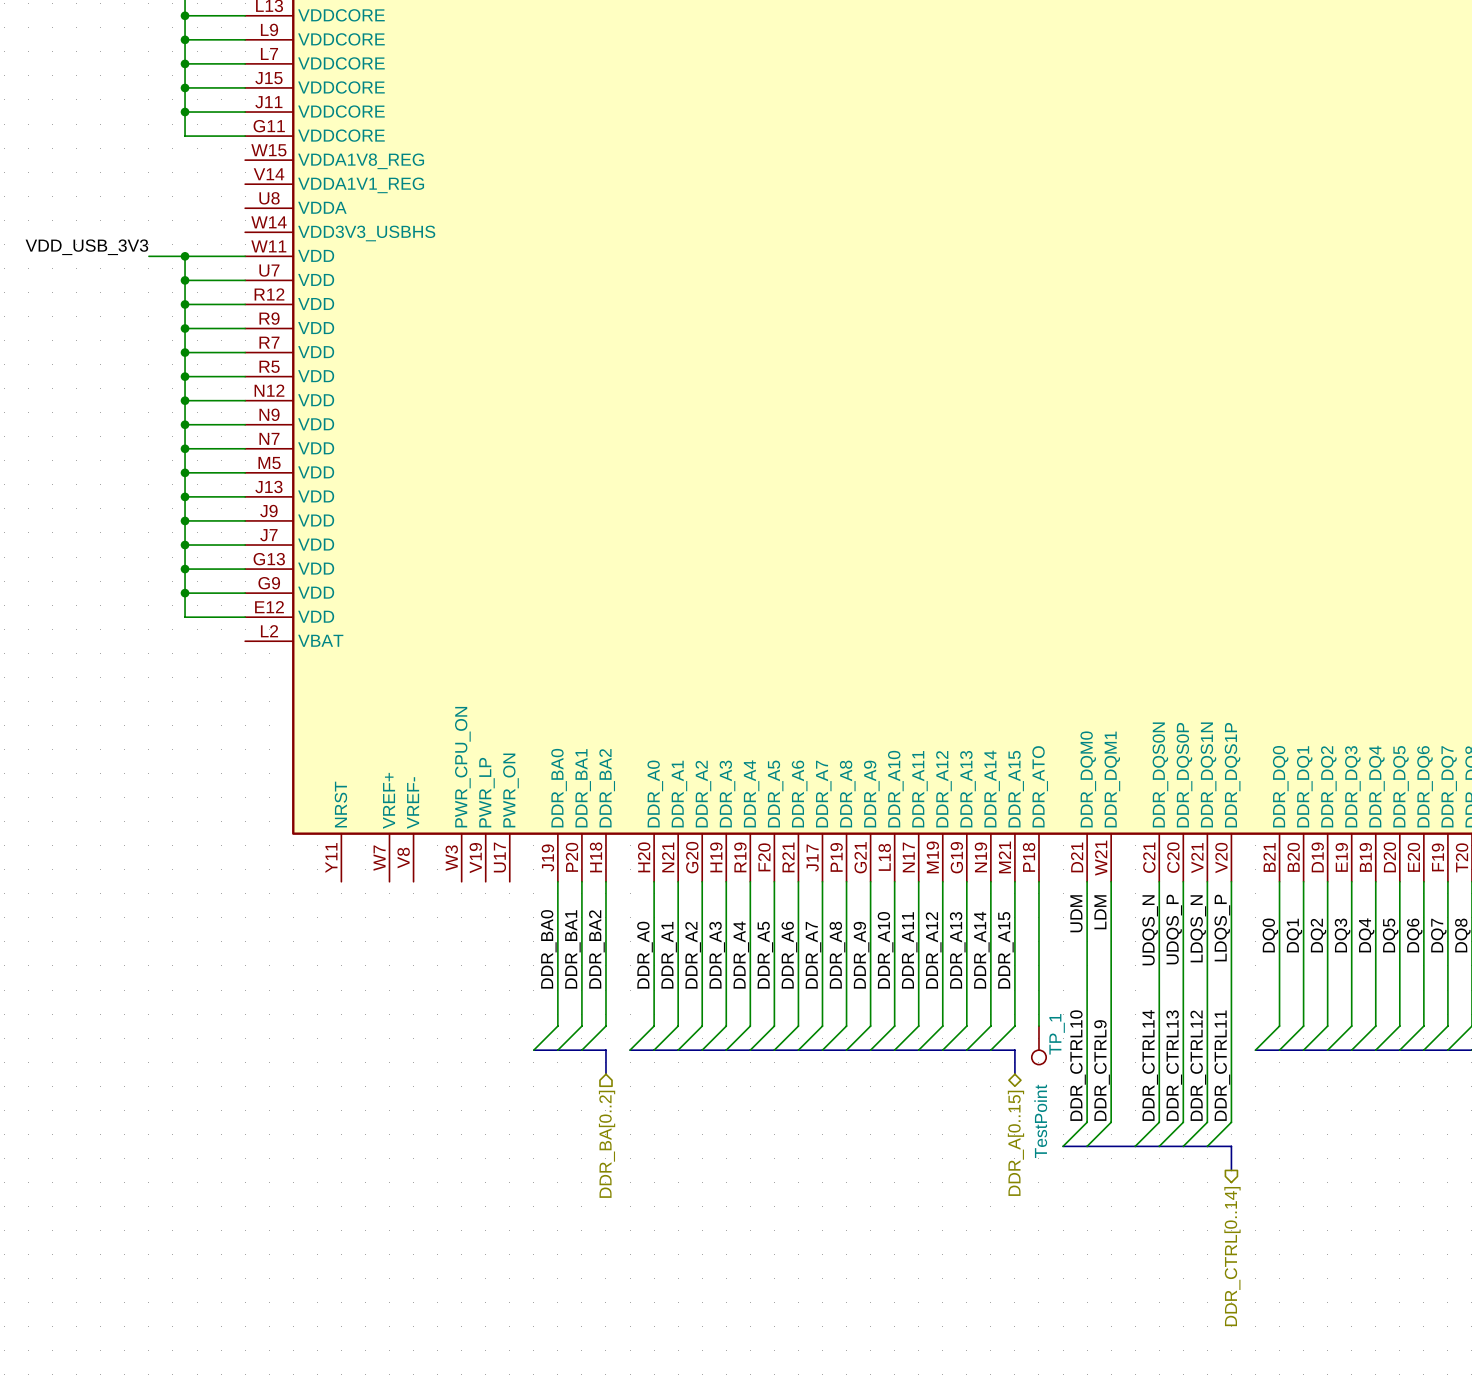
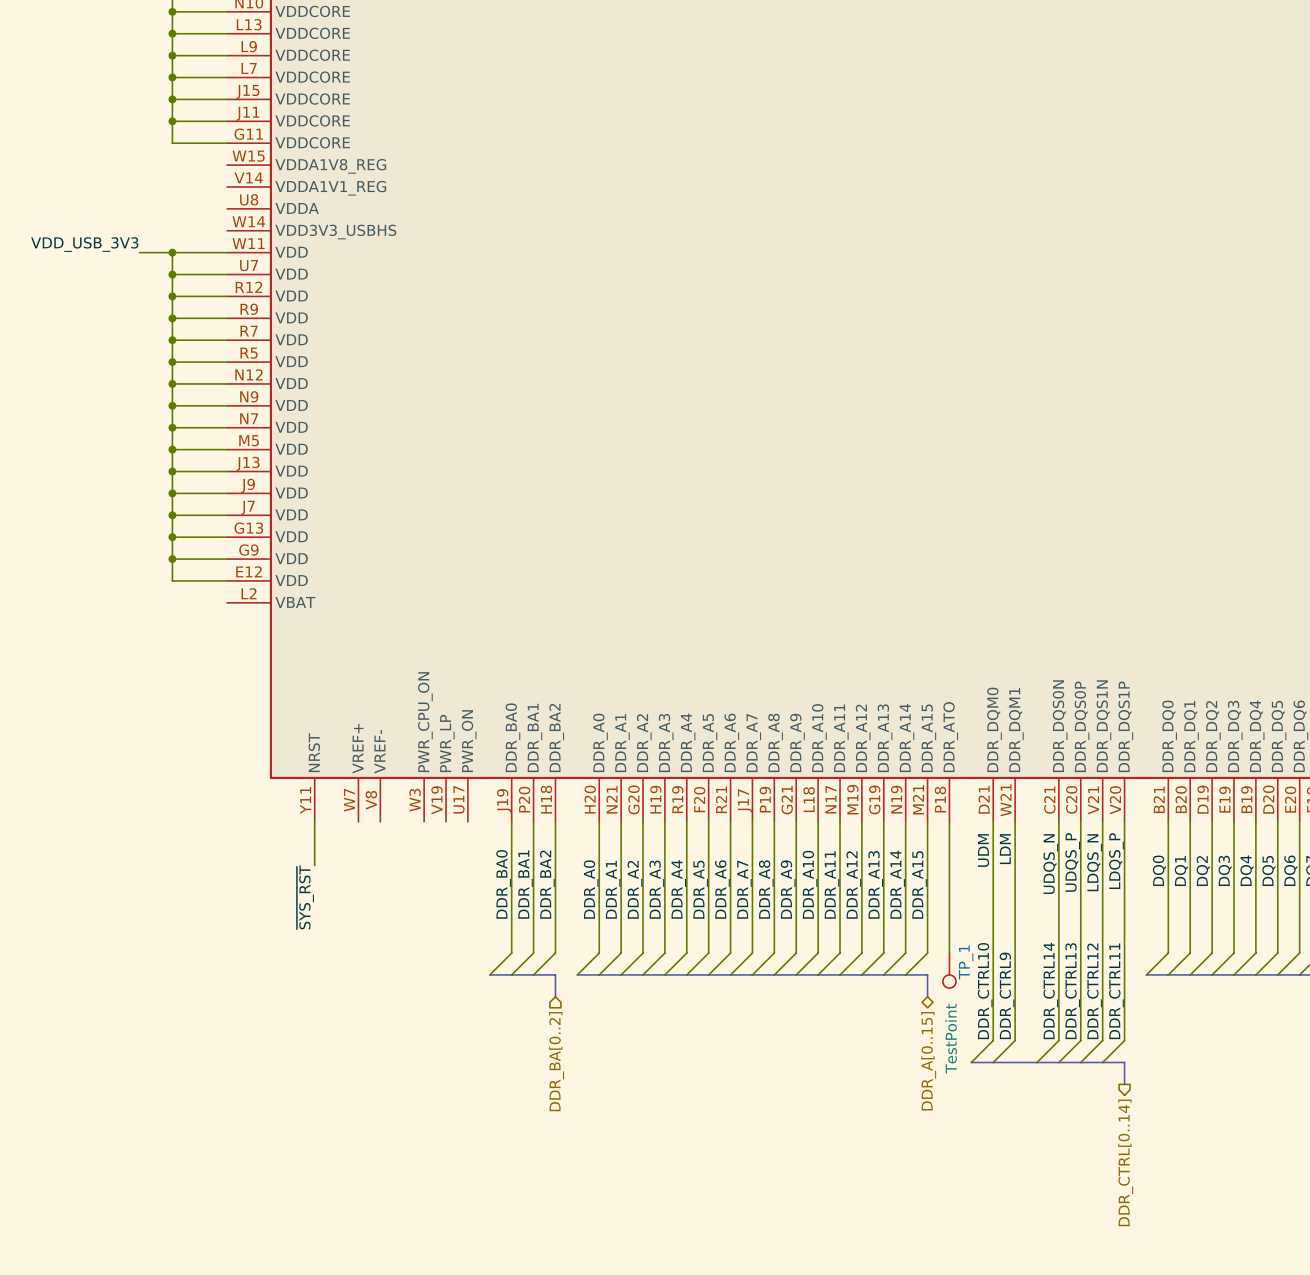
wire: none -> (314, 821) (314, 865)
label: none -> ~{SYS_RST} (305, 897)

